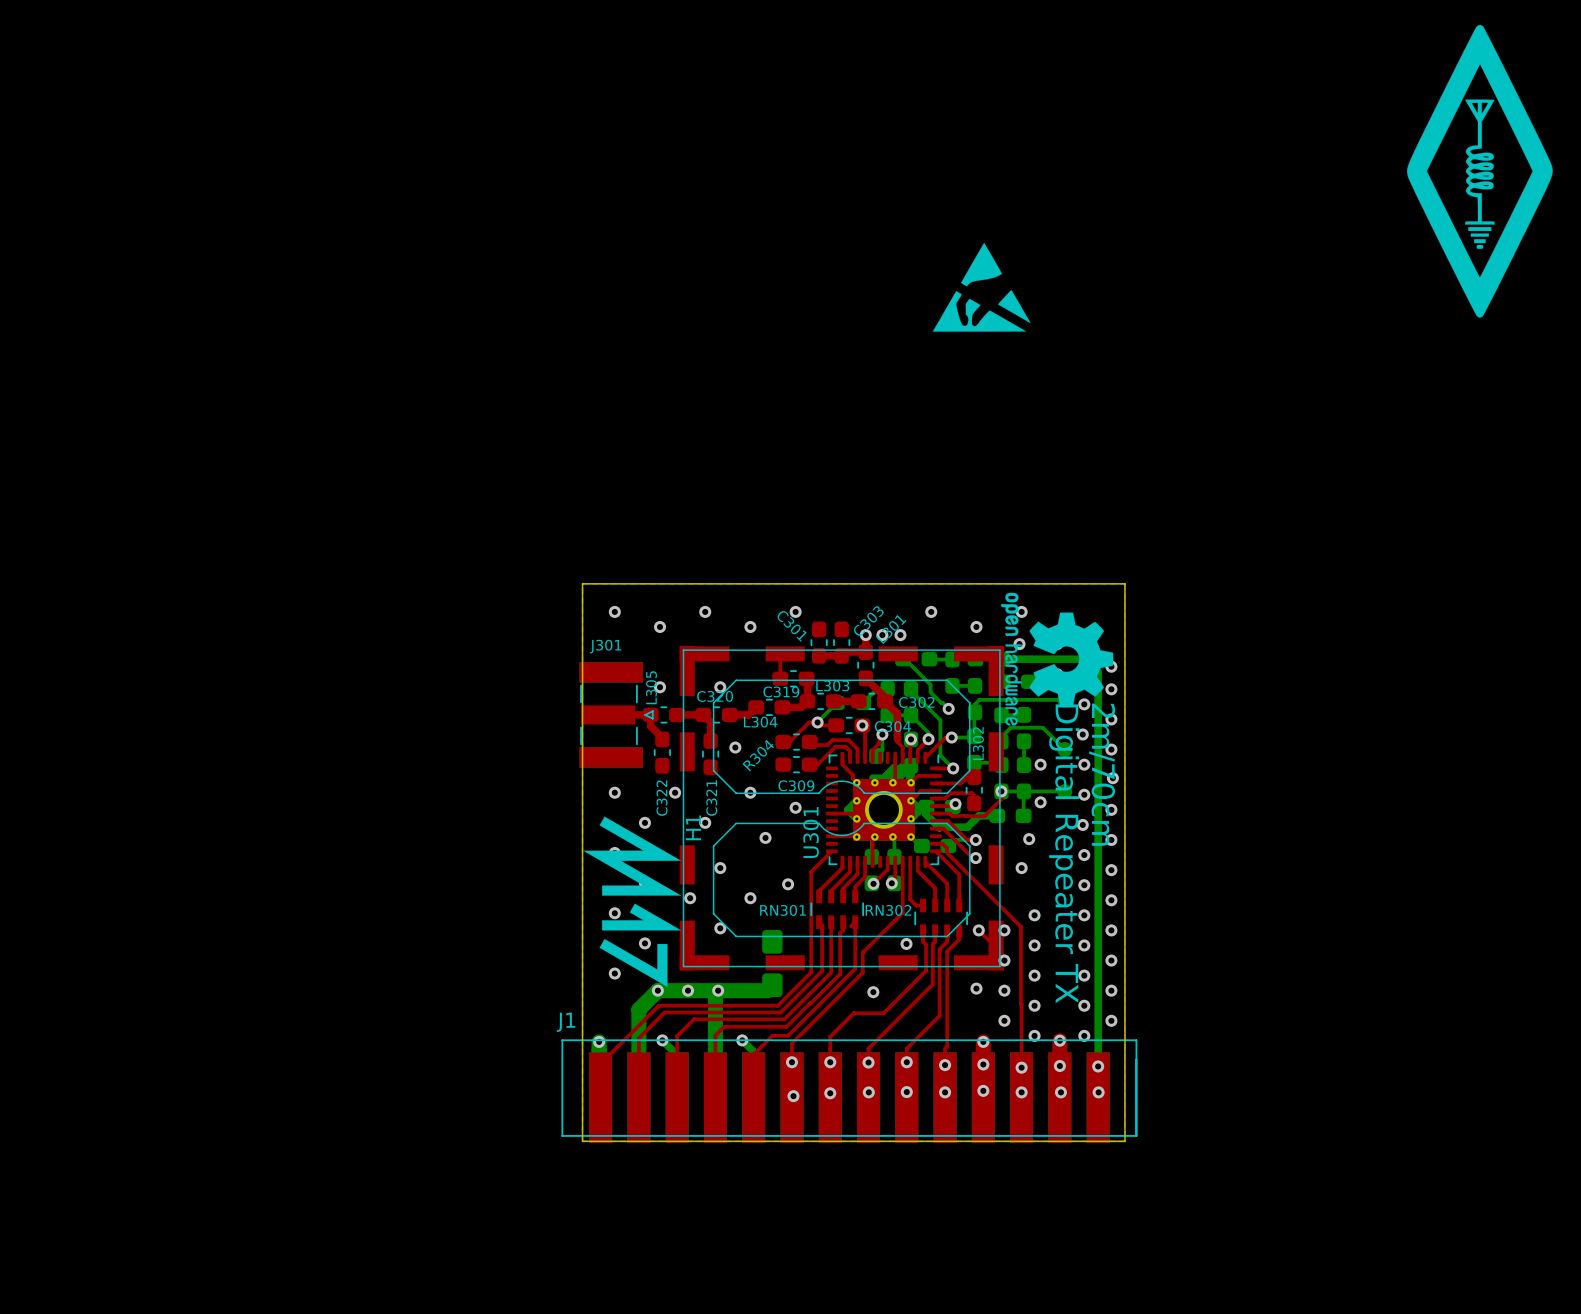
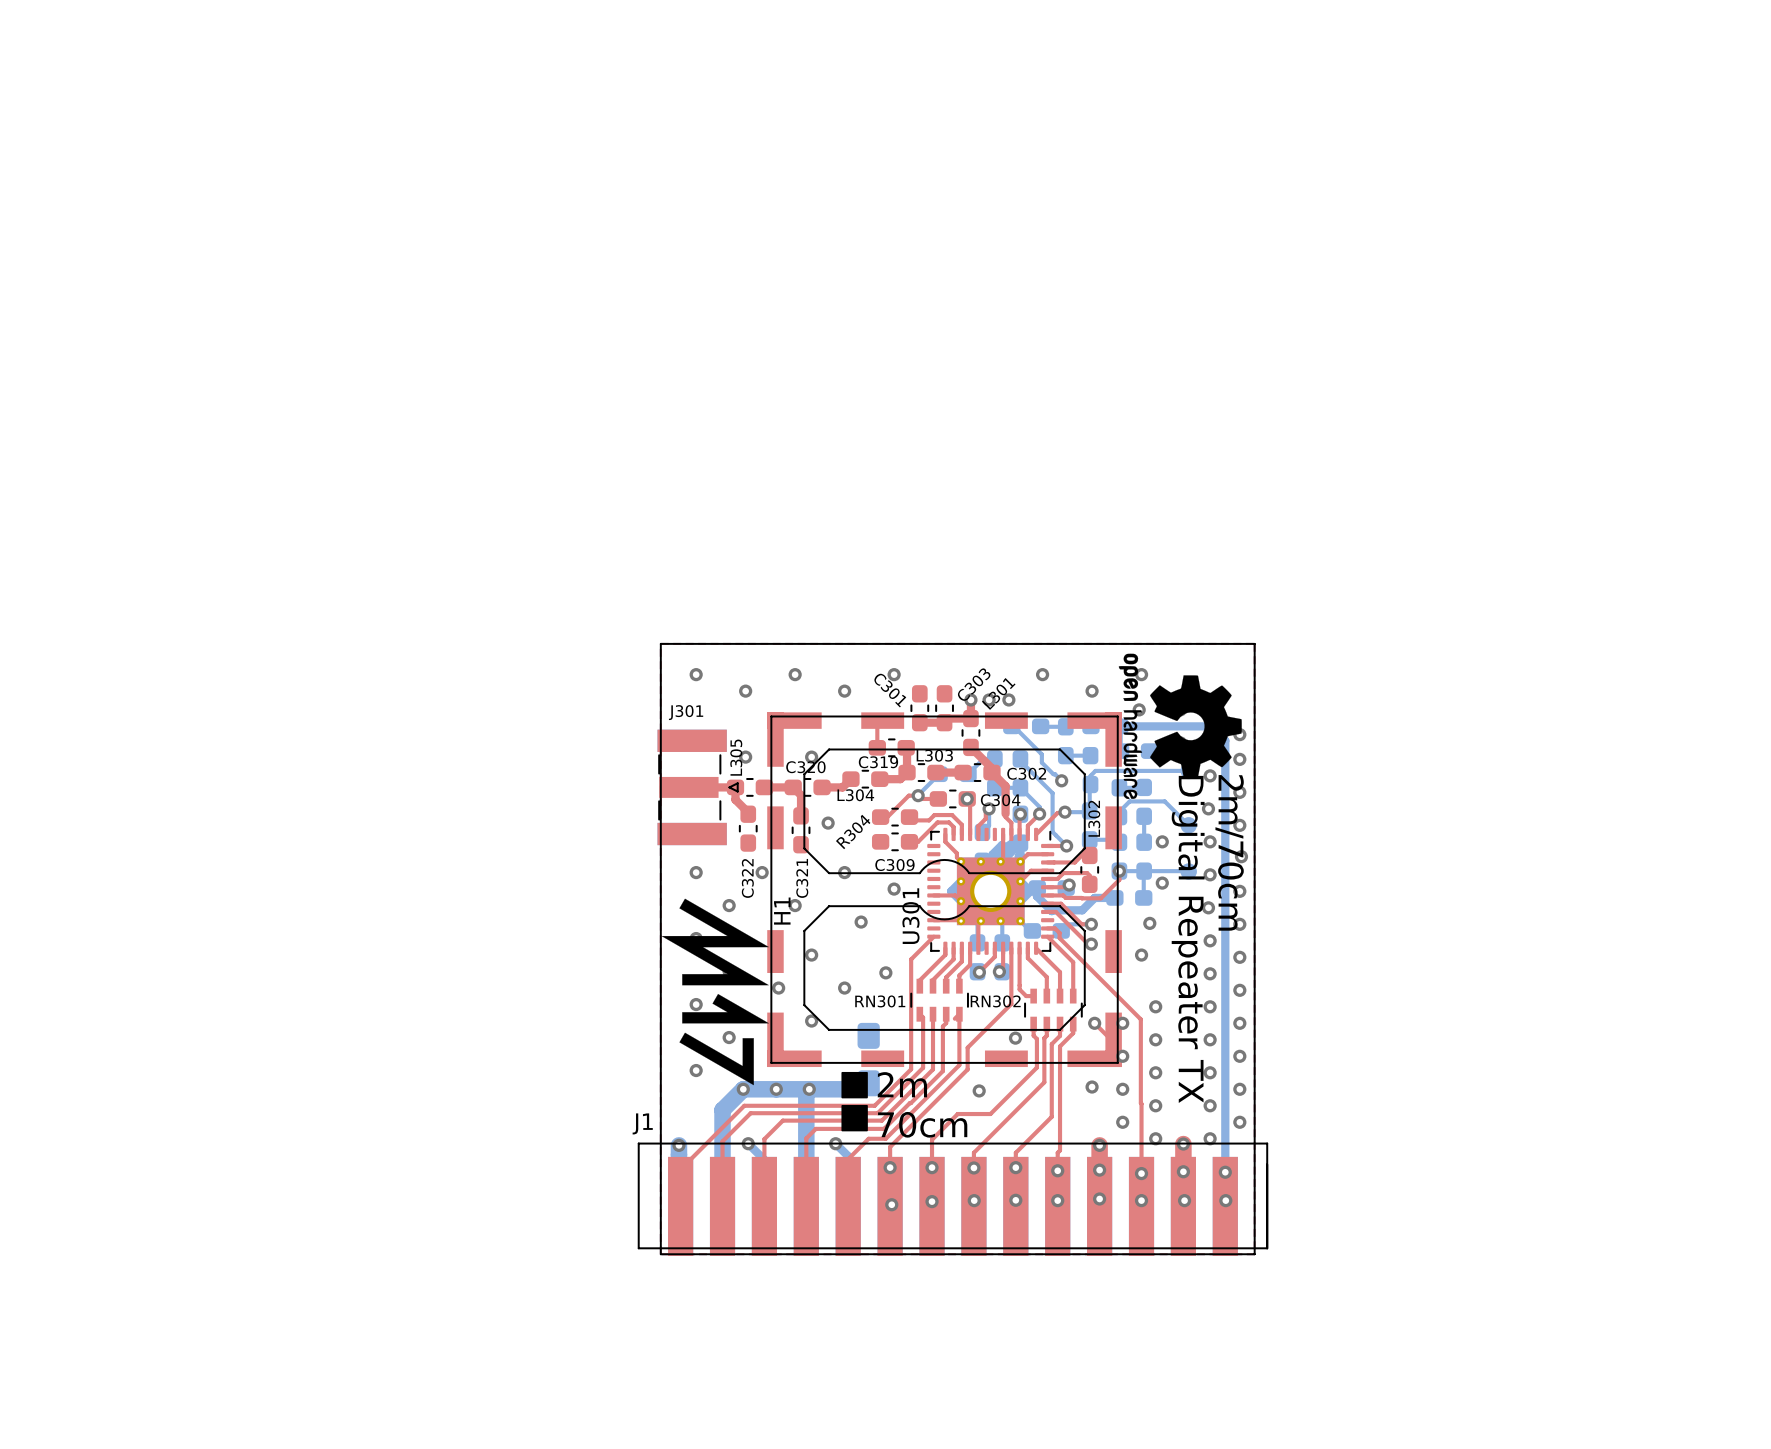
drawing: [1407, 24, 1553, 318] -> none
drawing: [932, 242, 1031, 332] -> none
drawing: none -> [841, 1071, 868, 1132]
text: none -> 2m (902, 1084)
text: none -> 70cm (922, 1124)

